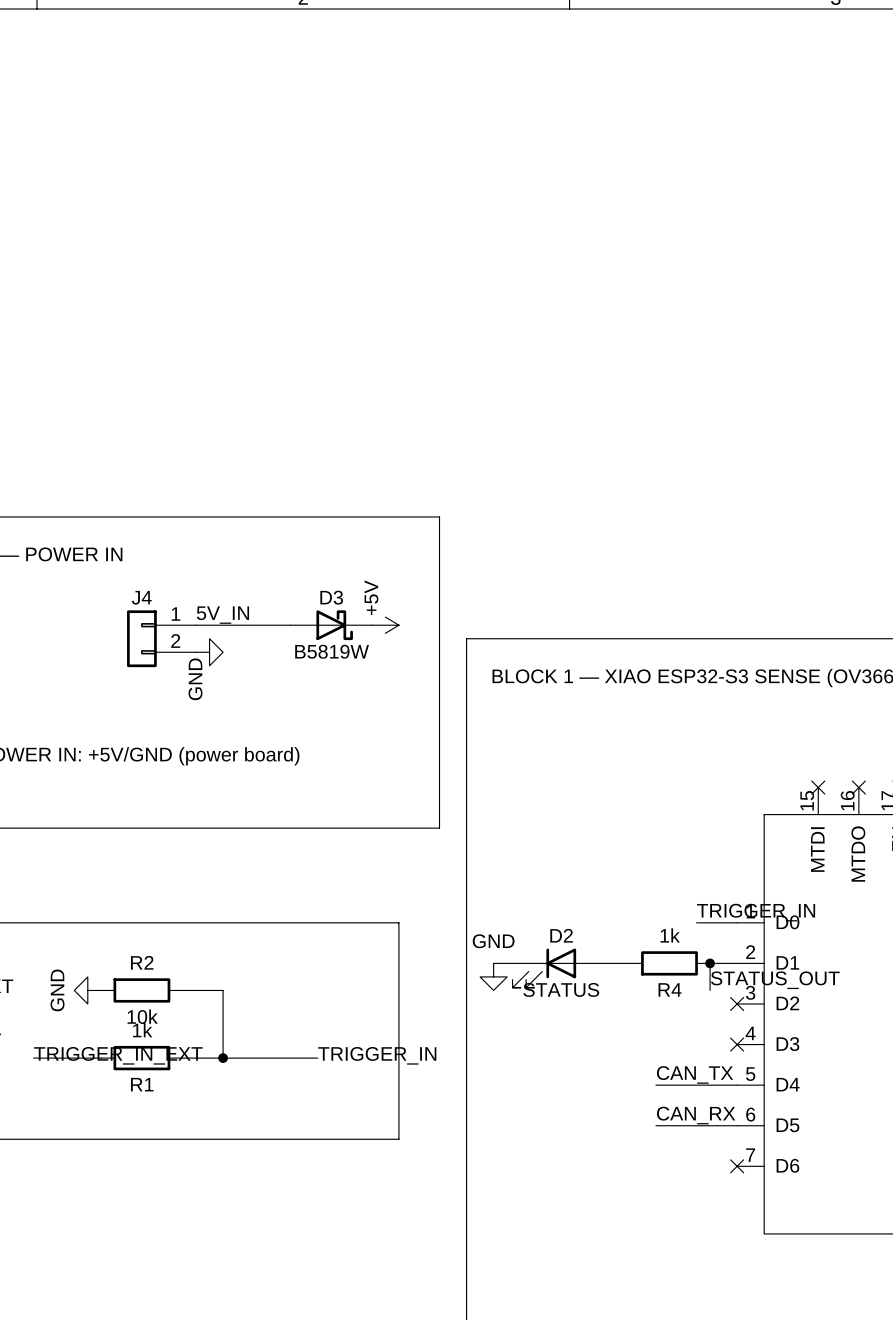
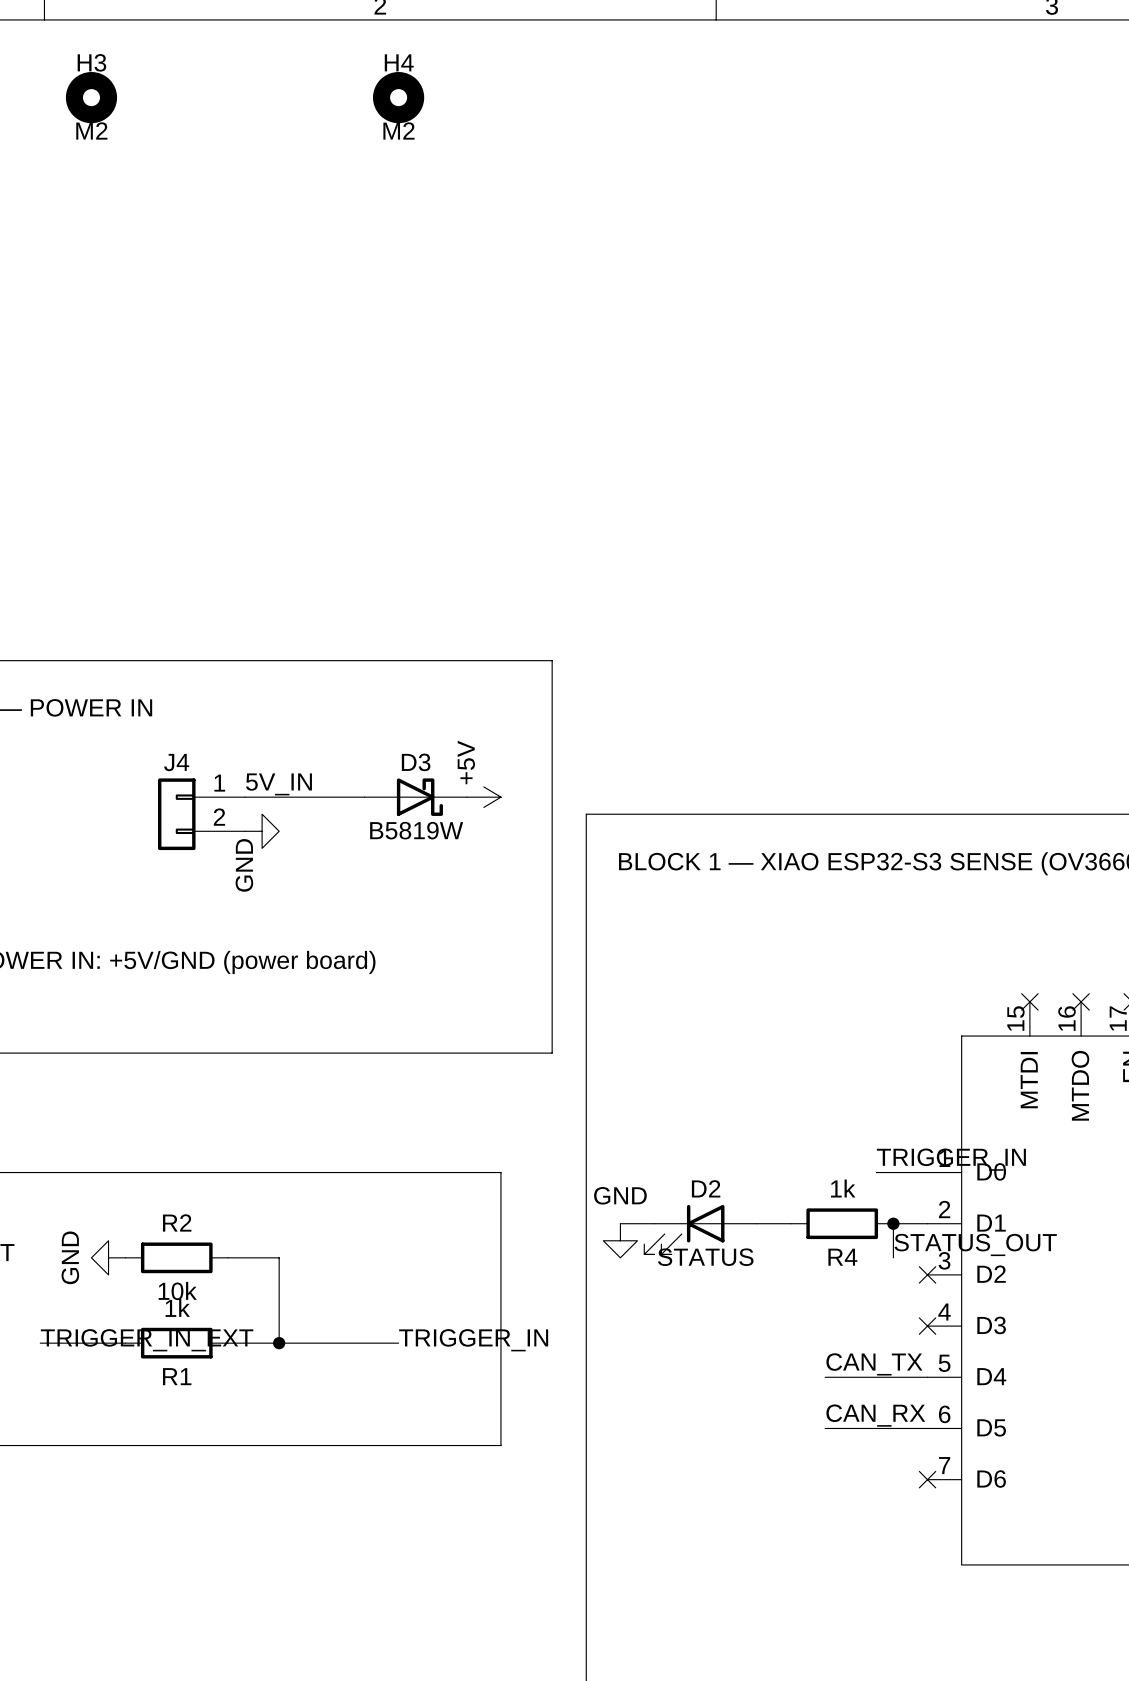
H3: none -> M2 (91, 97)
H4: none -> M2 (398, 97)

